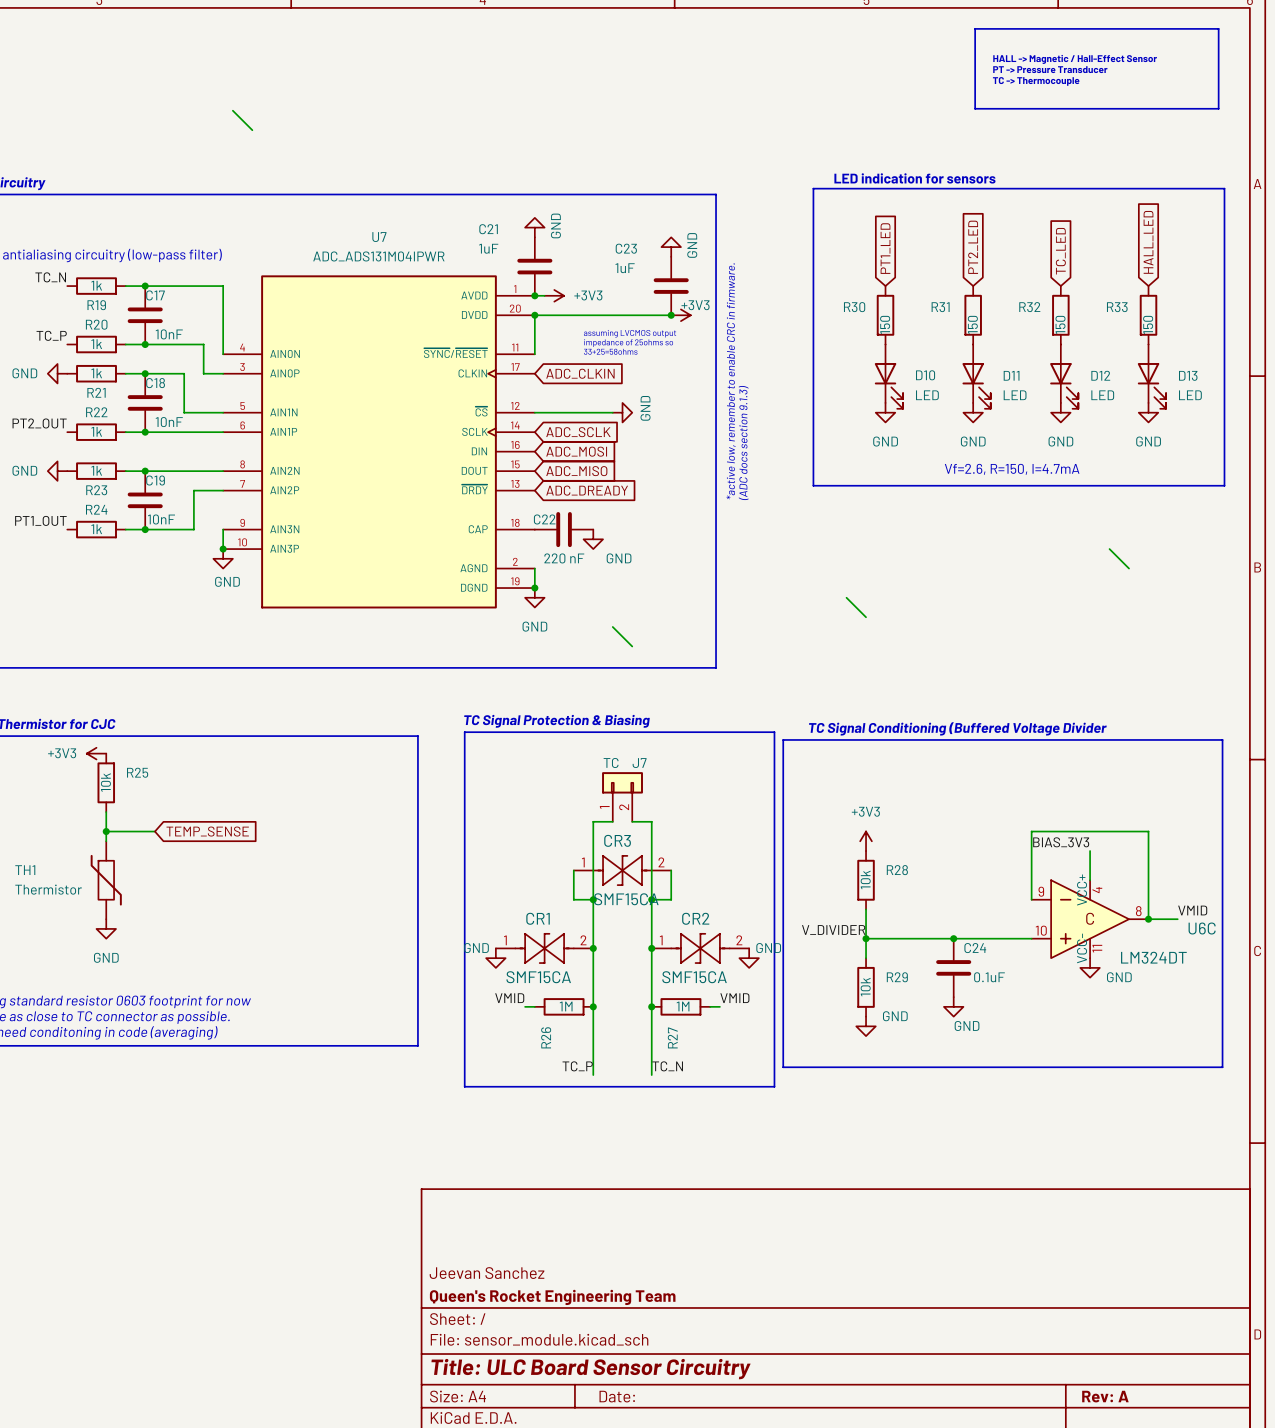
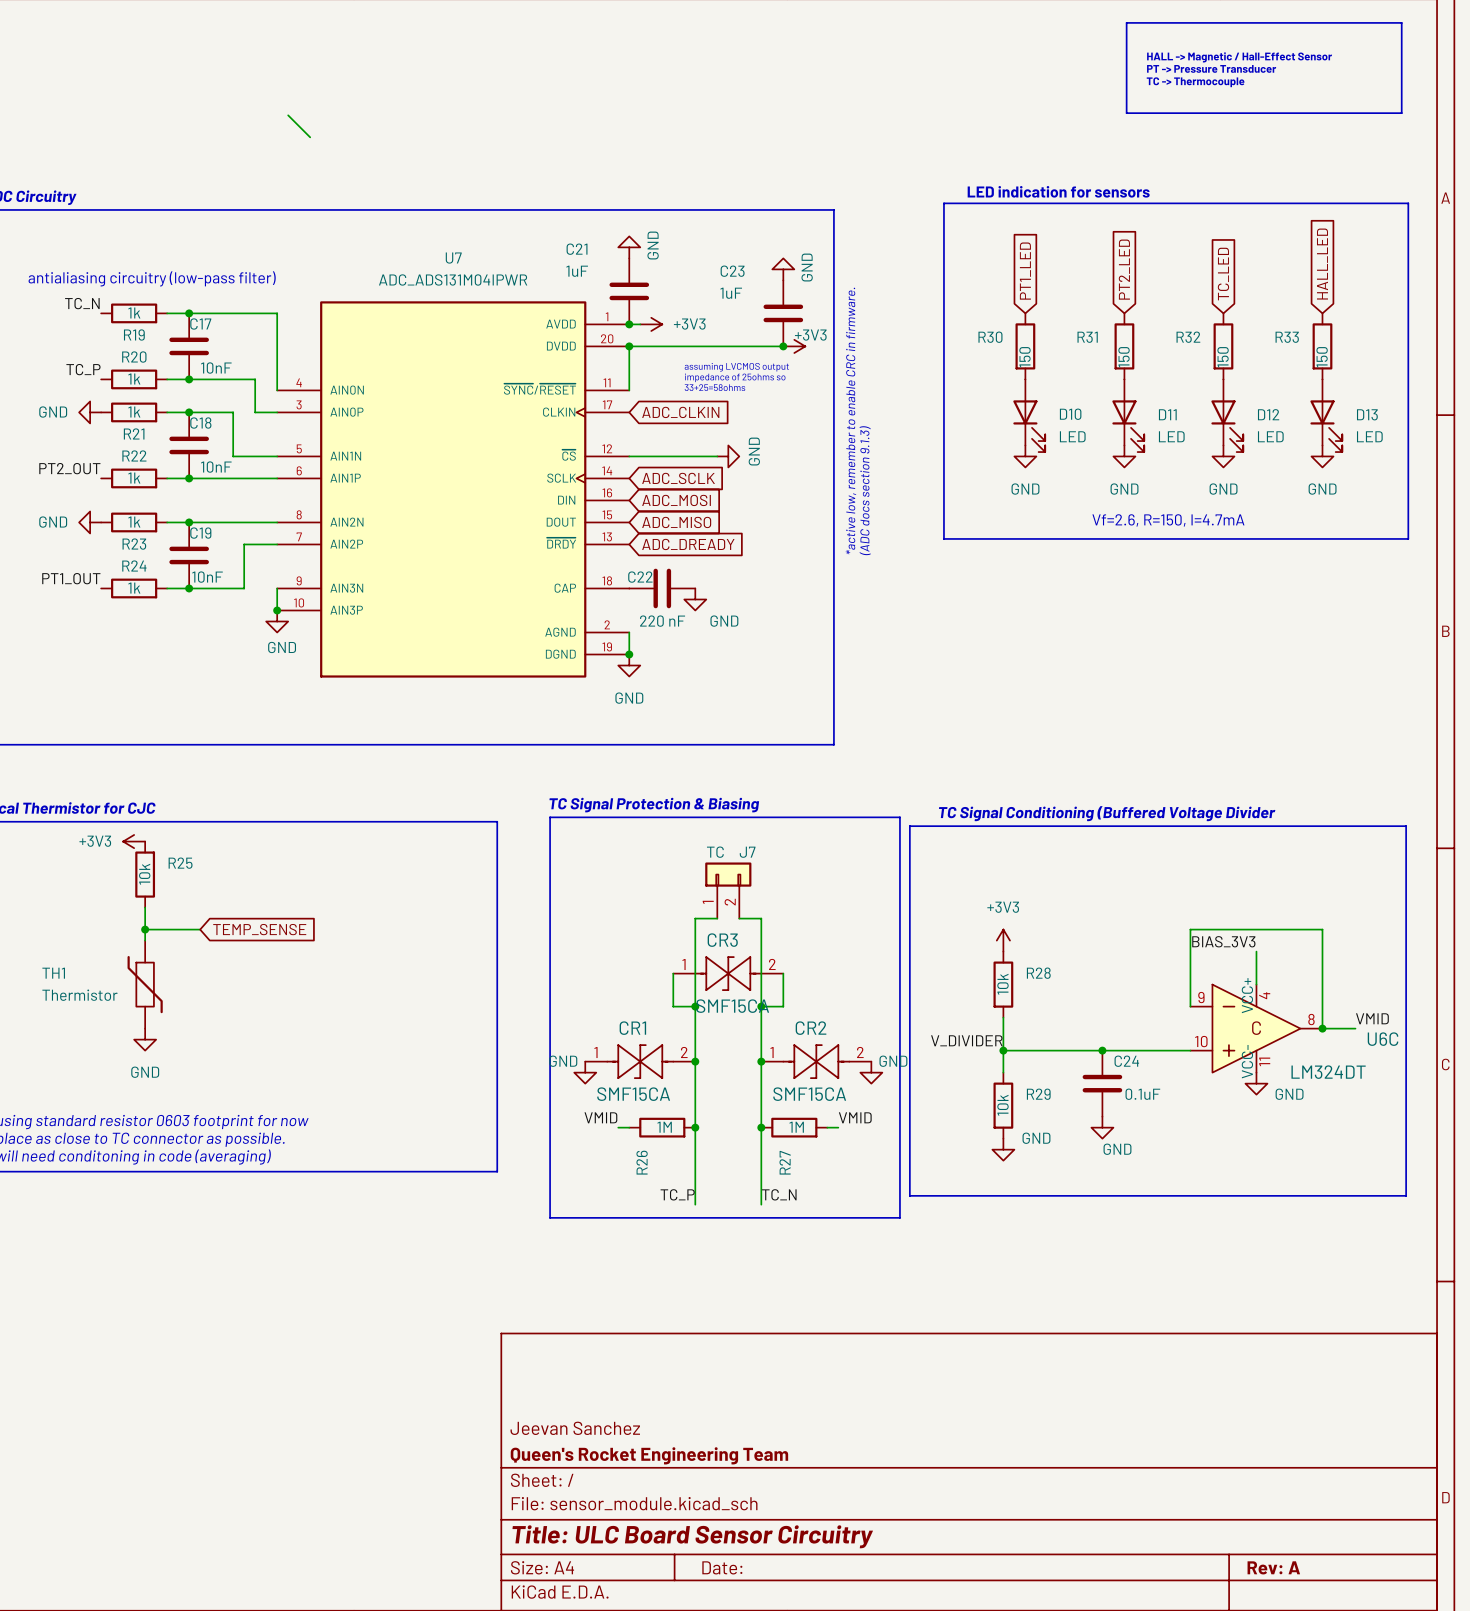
wire: (1109, 549) (1129, 568) -> none
wire: (846, 597) (866, 617) -> none
wire: (612, 626) (632, 646) -> none

